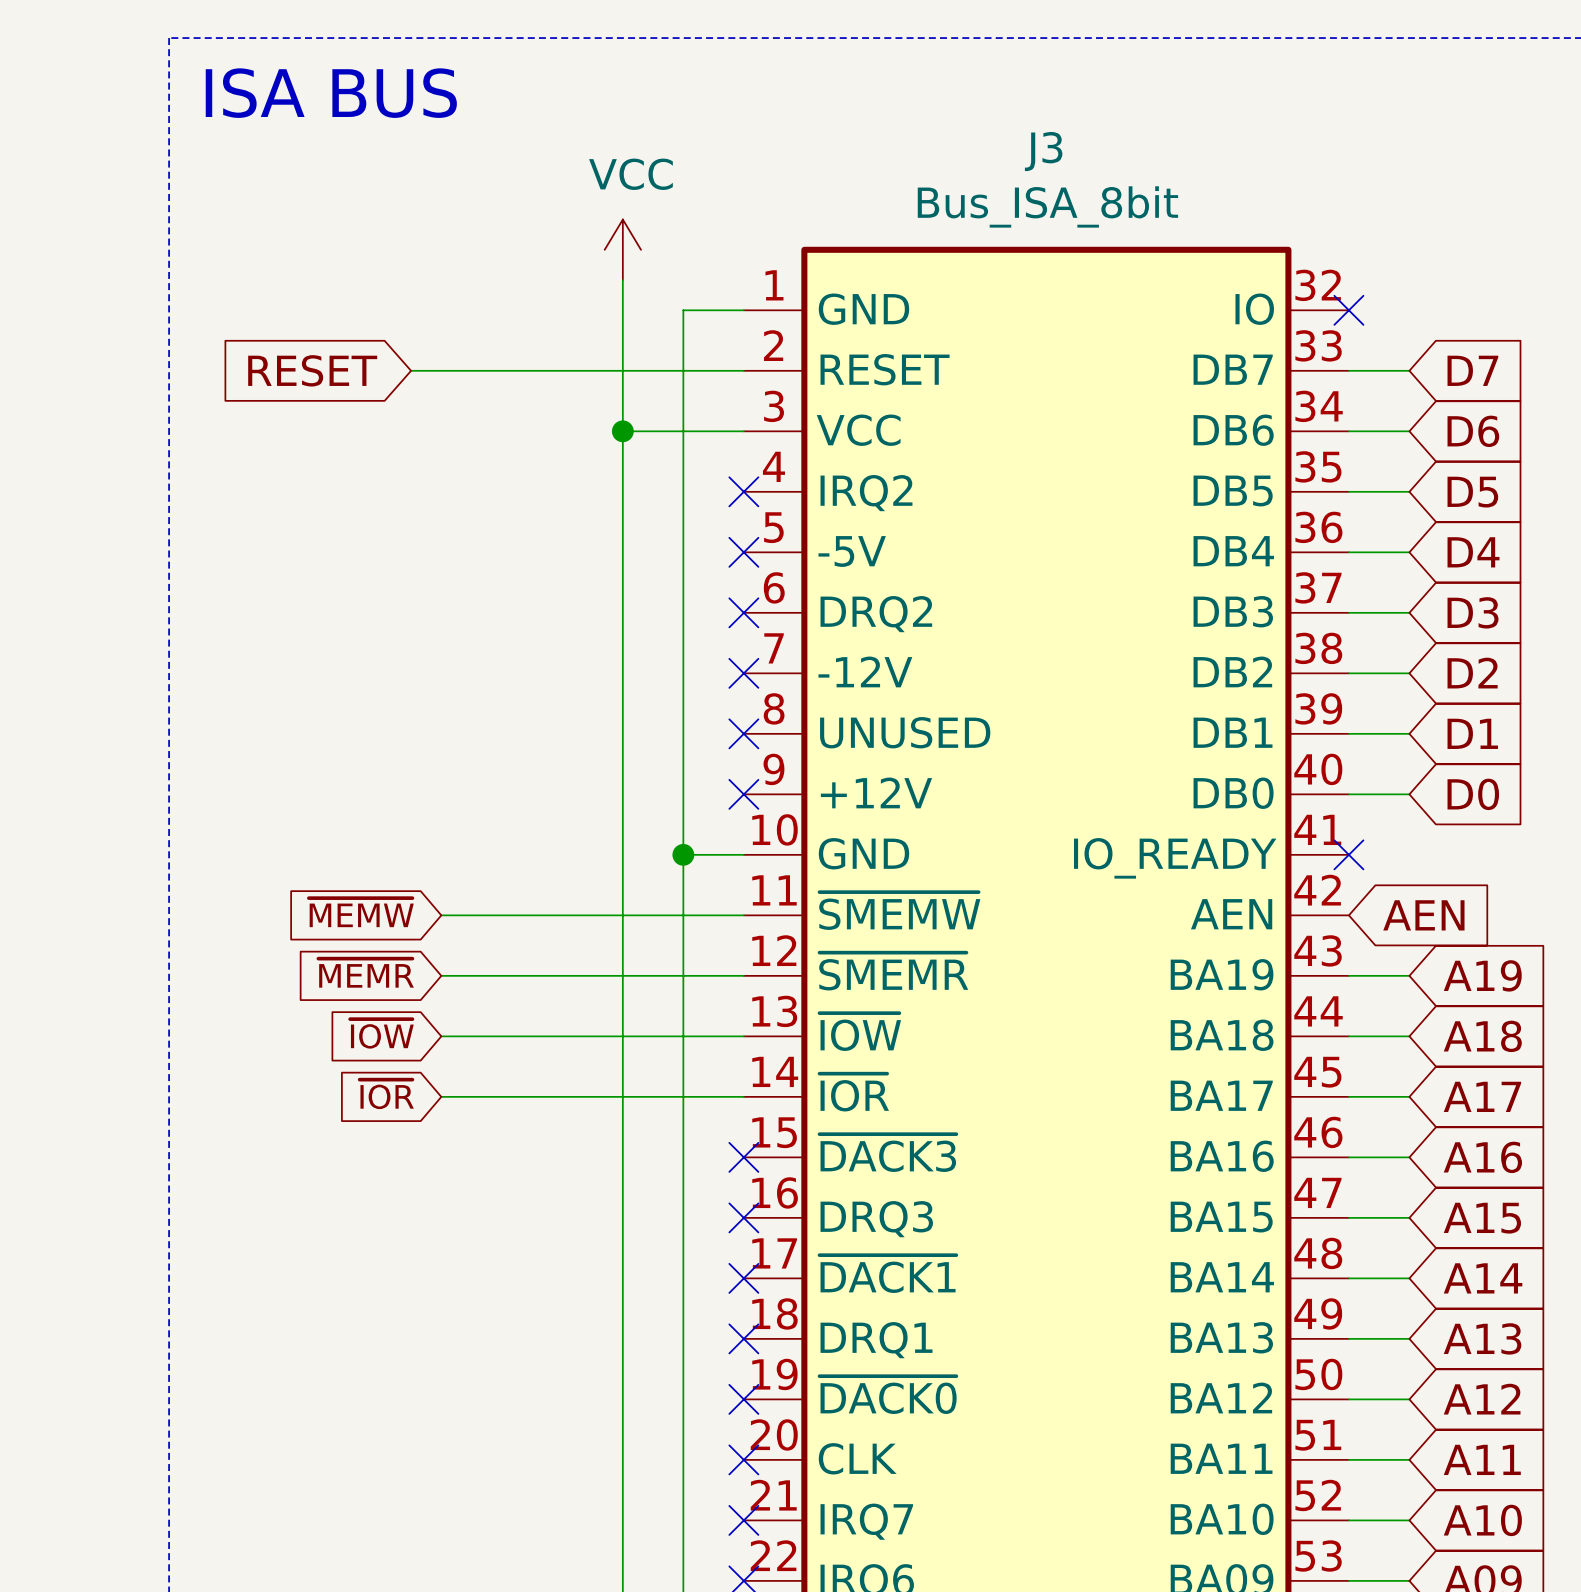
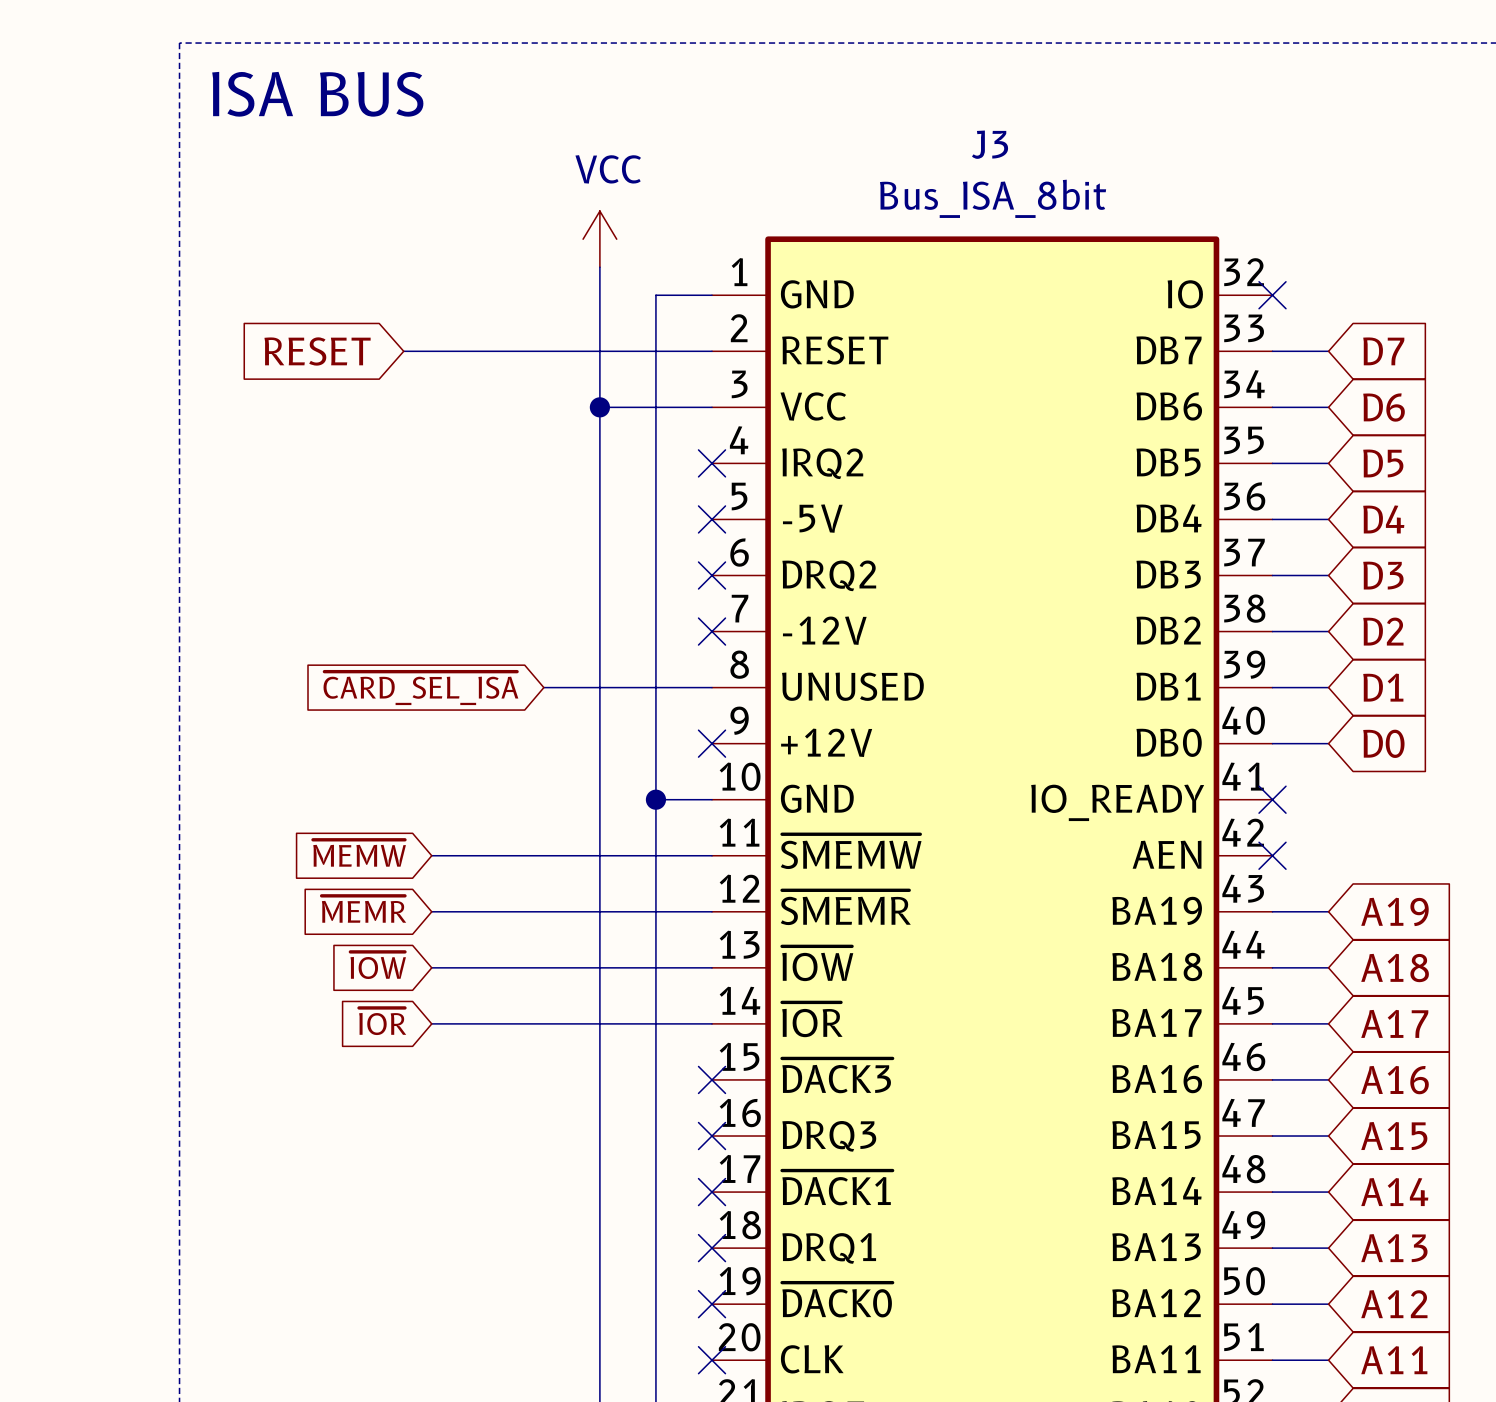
wire: none -> (543, 687) (712, 687)
no-connect mark: (743, 733) -> none
global label: none -> ~{CARD_SEL_ISA} (420, 688)
no-connect mark: none -> (1272, 855)
global label: AEN (1423, 915) -> none

